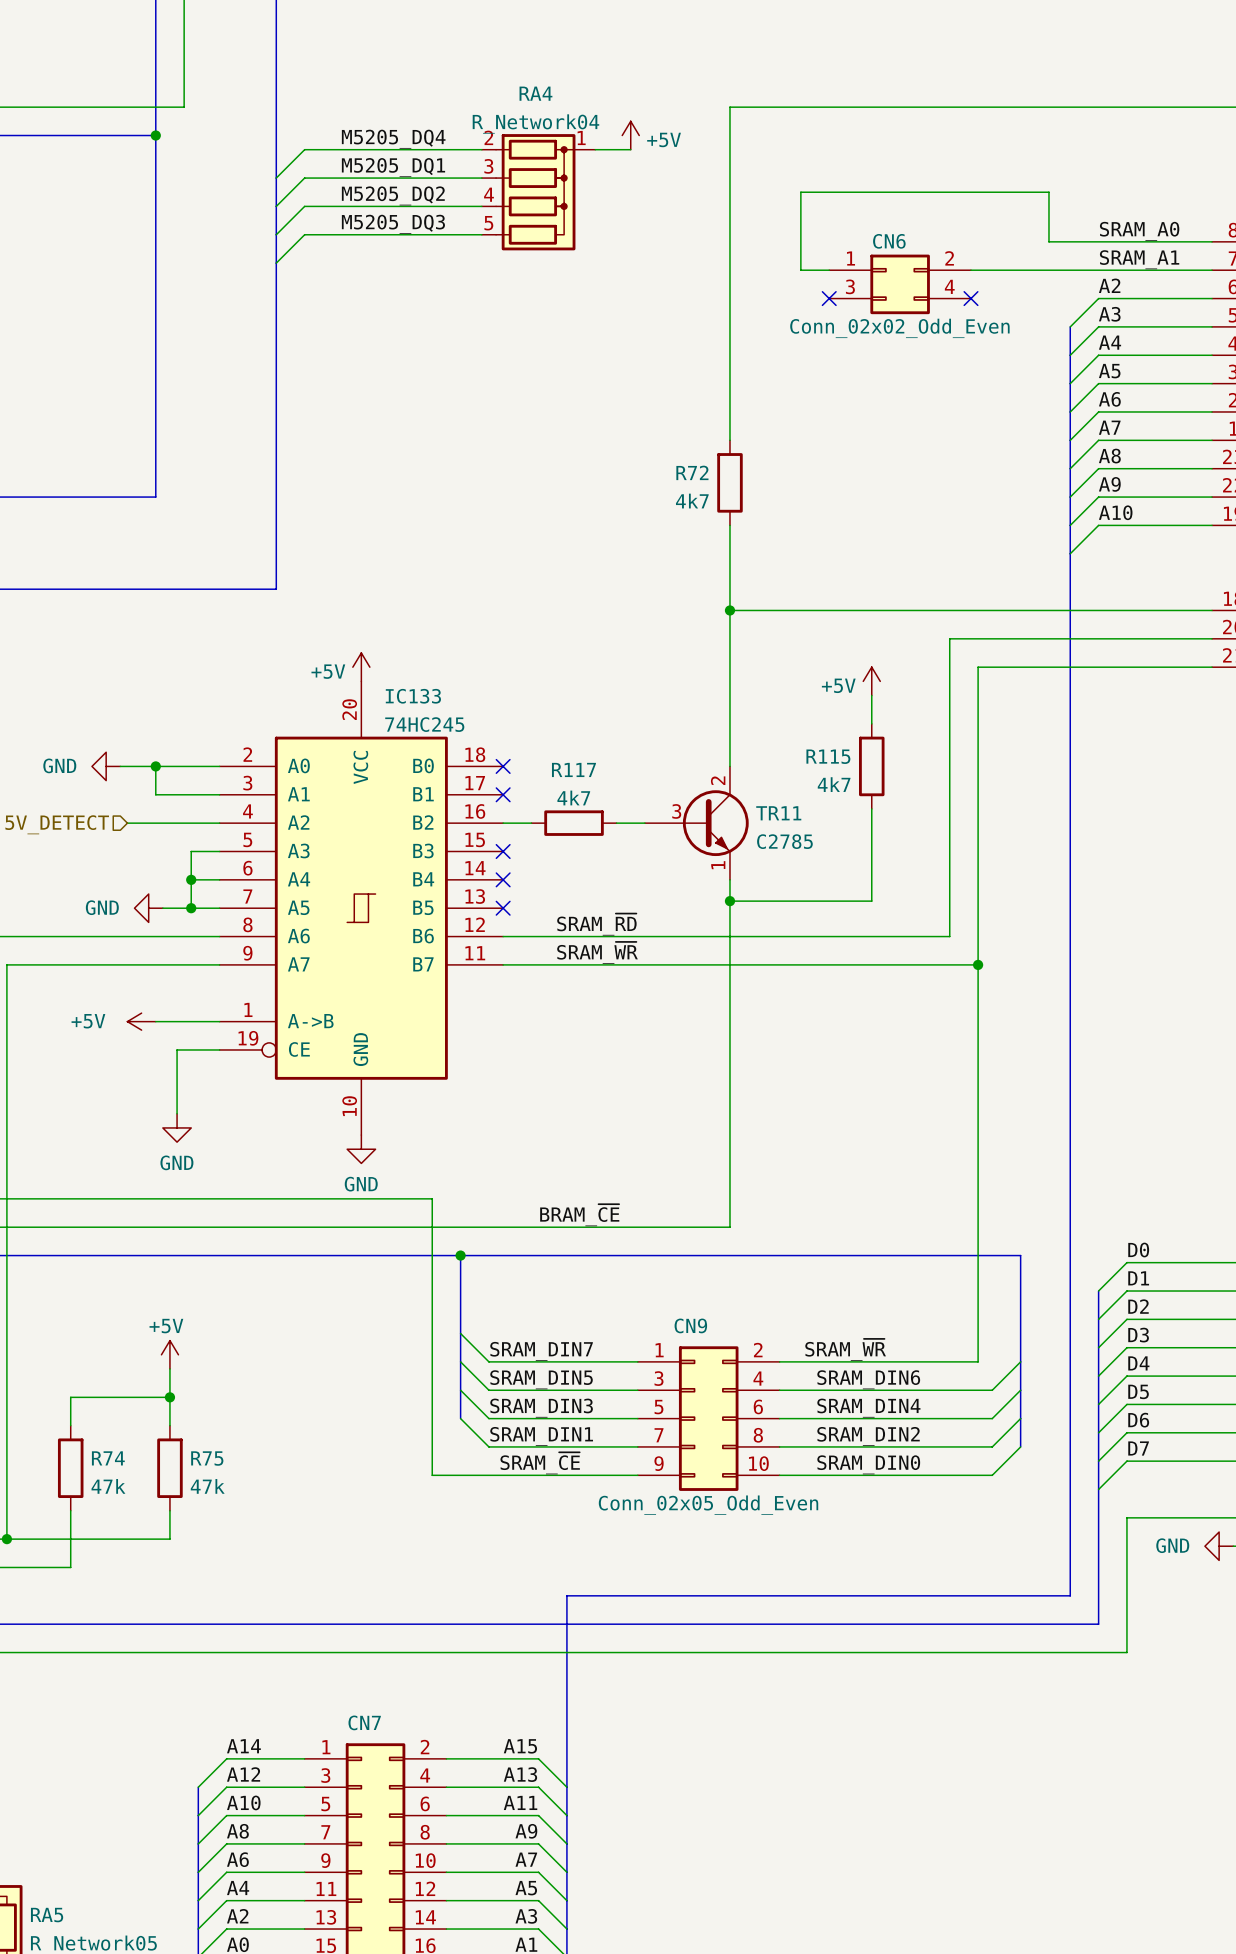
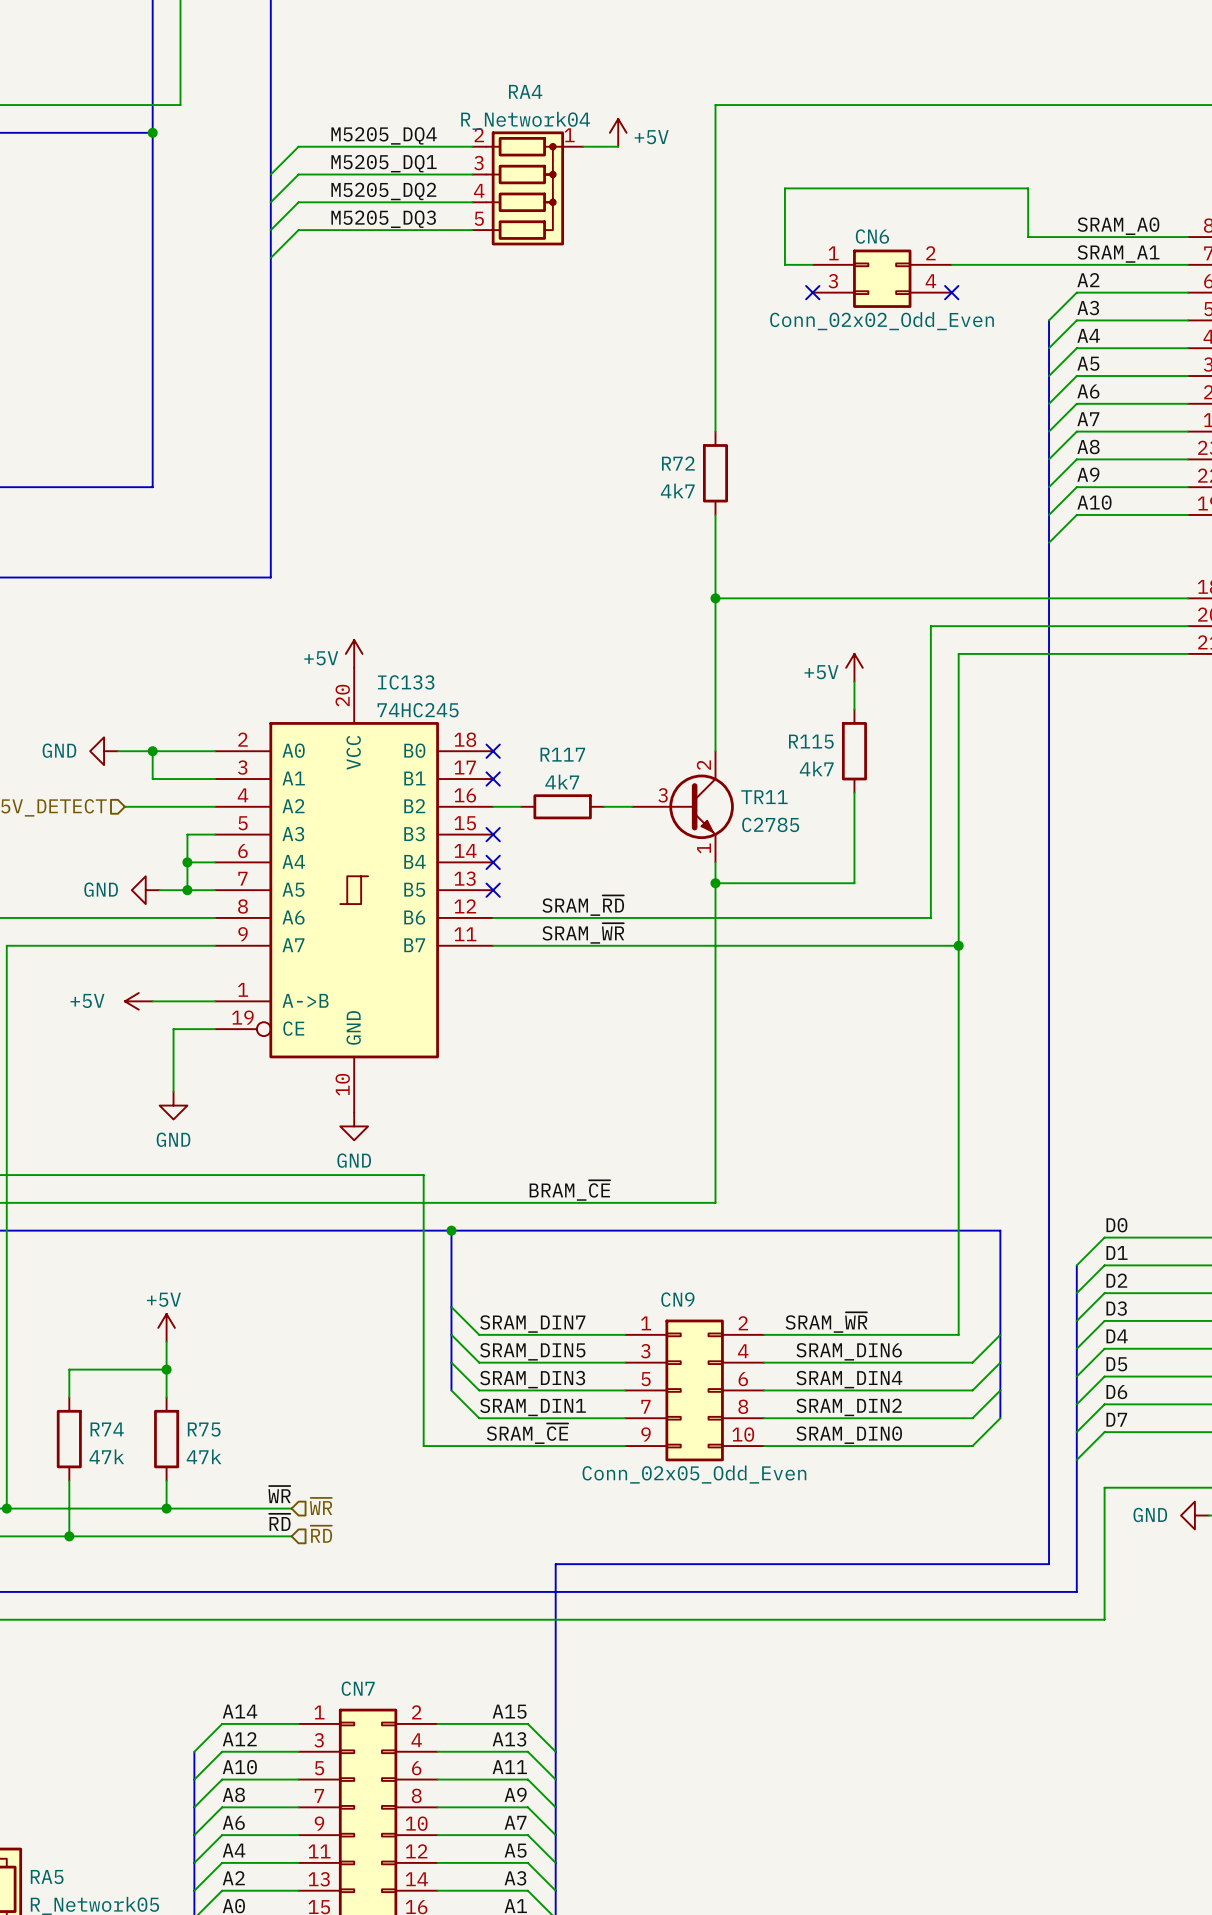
label: none -> ~{WR} (279, 1494)
hierarchical label: none -> ~{WR} (321, 1506)
wire: none -> (166, 1508) (291, 1508)
junction: none -> (166, 1508)
label: none -> ~{RD} (279, 1522)
hierarchical label: none -> ~{RD} (321, 1534)
wire: none -> (69, 1536) (291, 1536)
junction: none -> (69, 1536)

